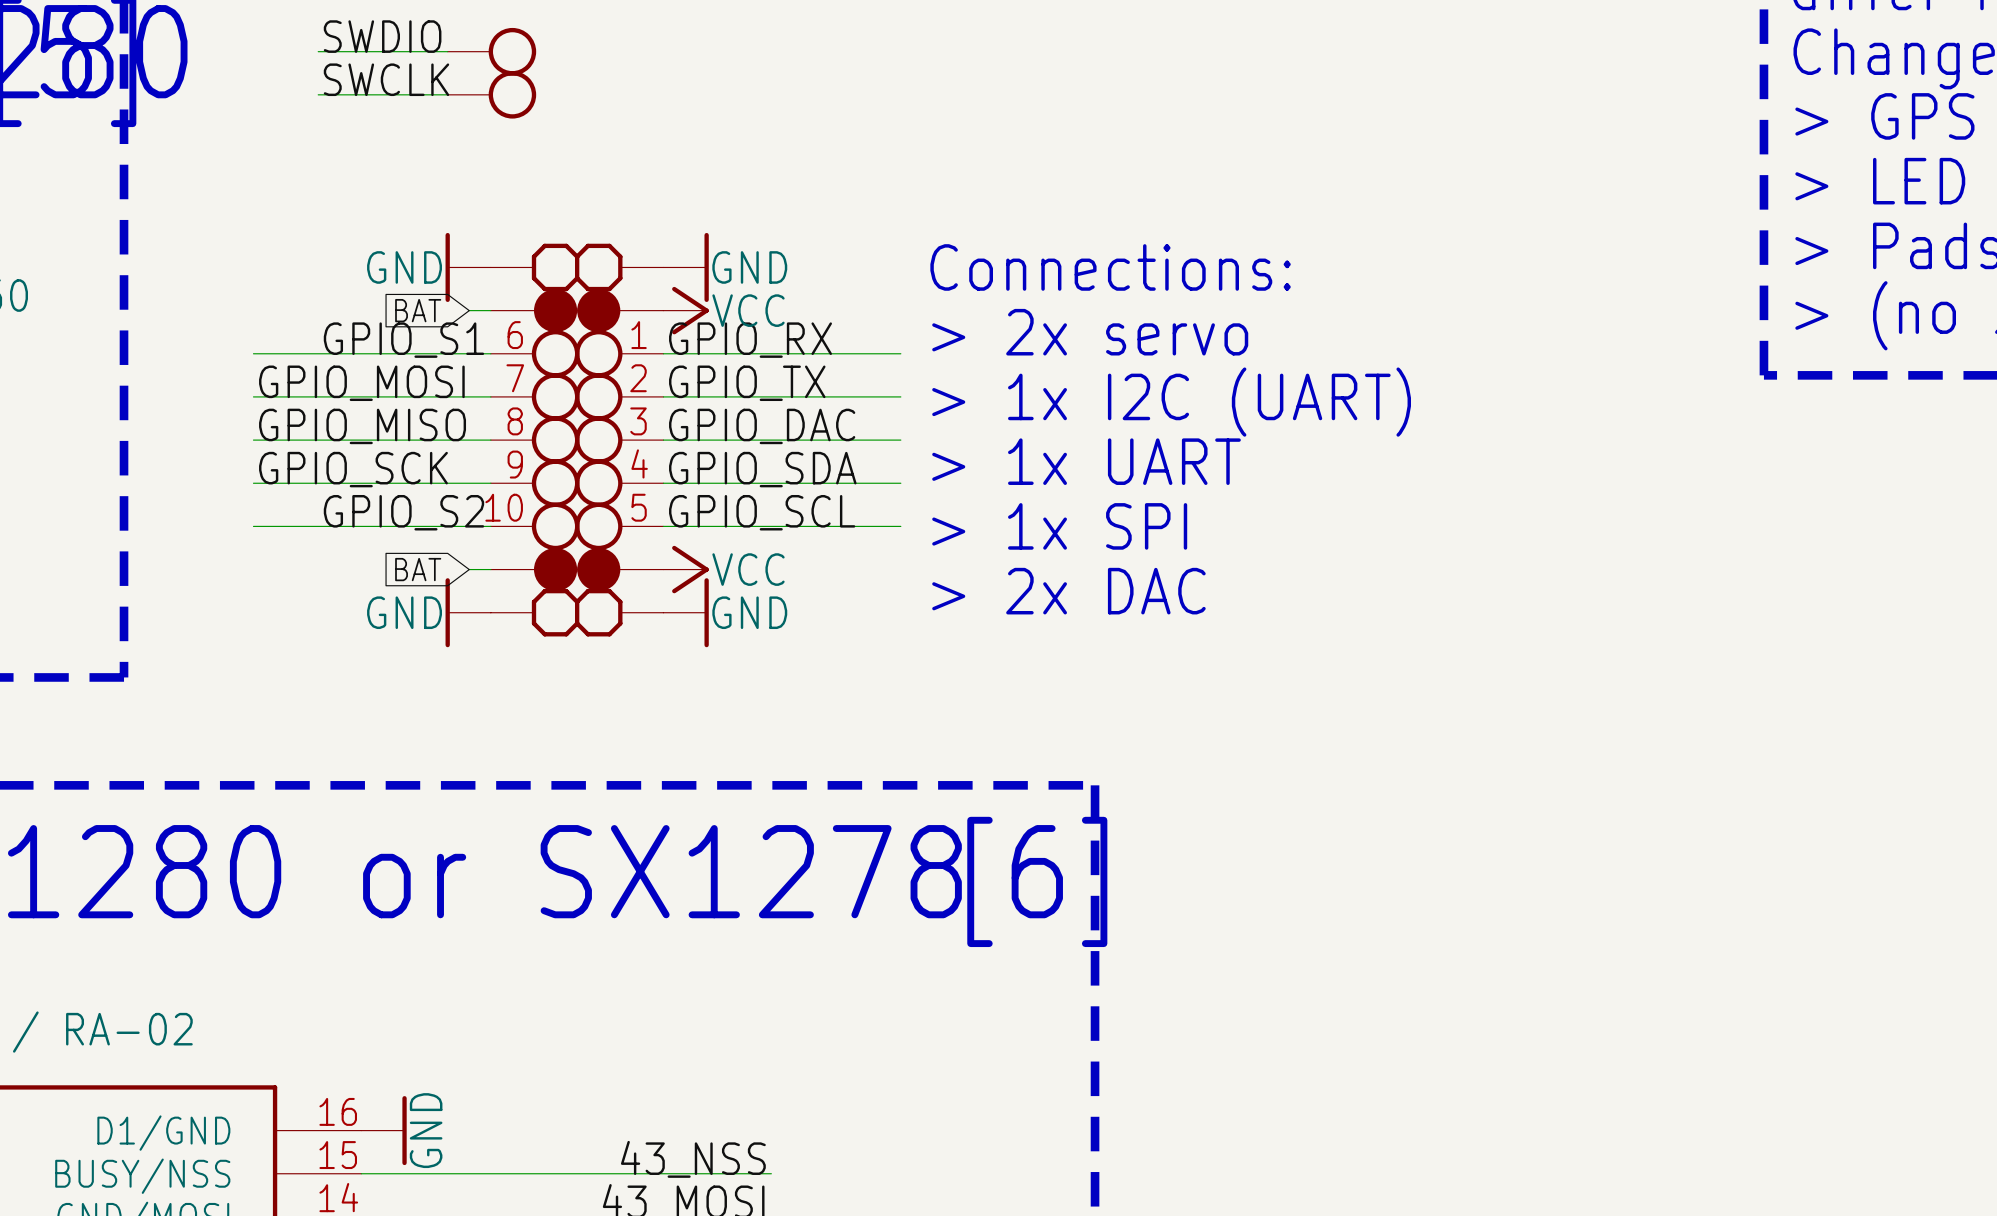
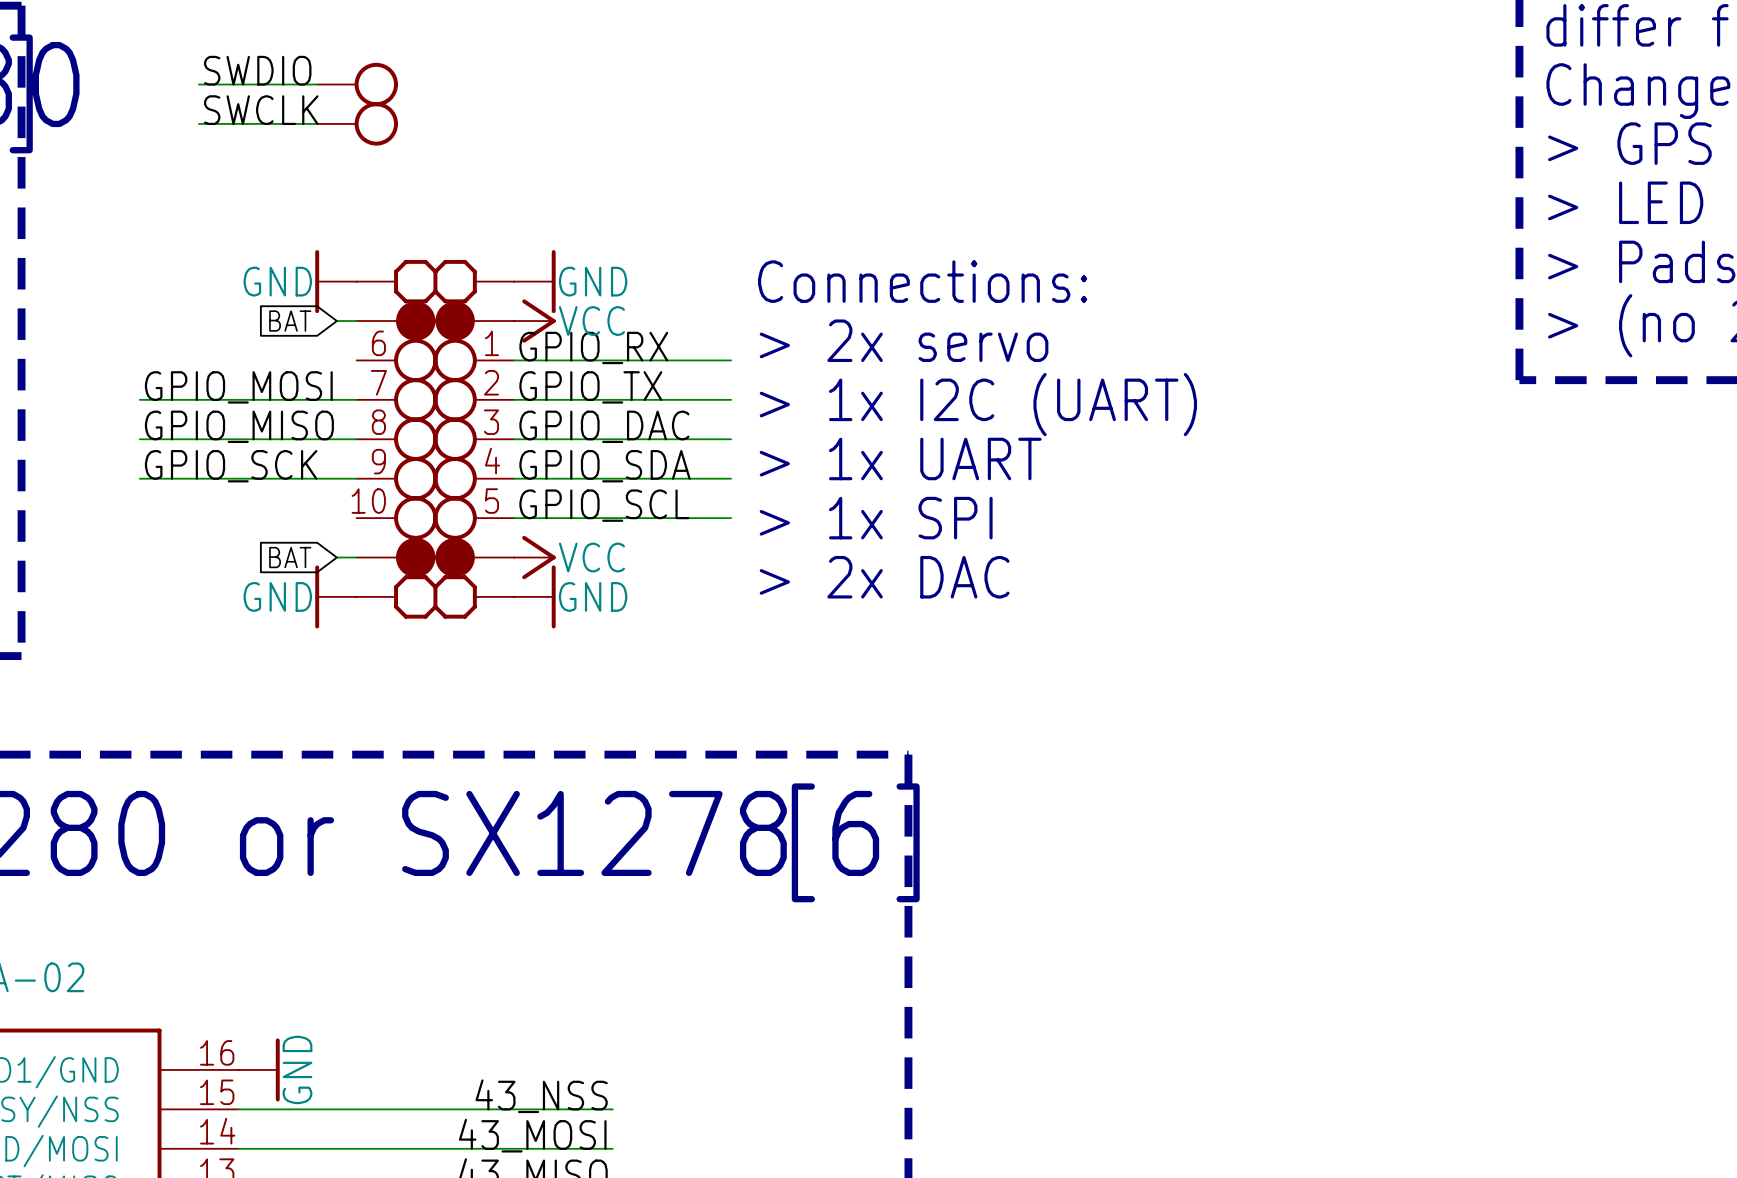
label: GPIO_S1 (403, 340) -> none
wire: (253, 353) (490, 353) -> none
label: GPIO_S2 (403, 512) -> none
wire: (253, 526) (490, 526) -> none

